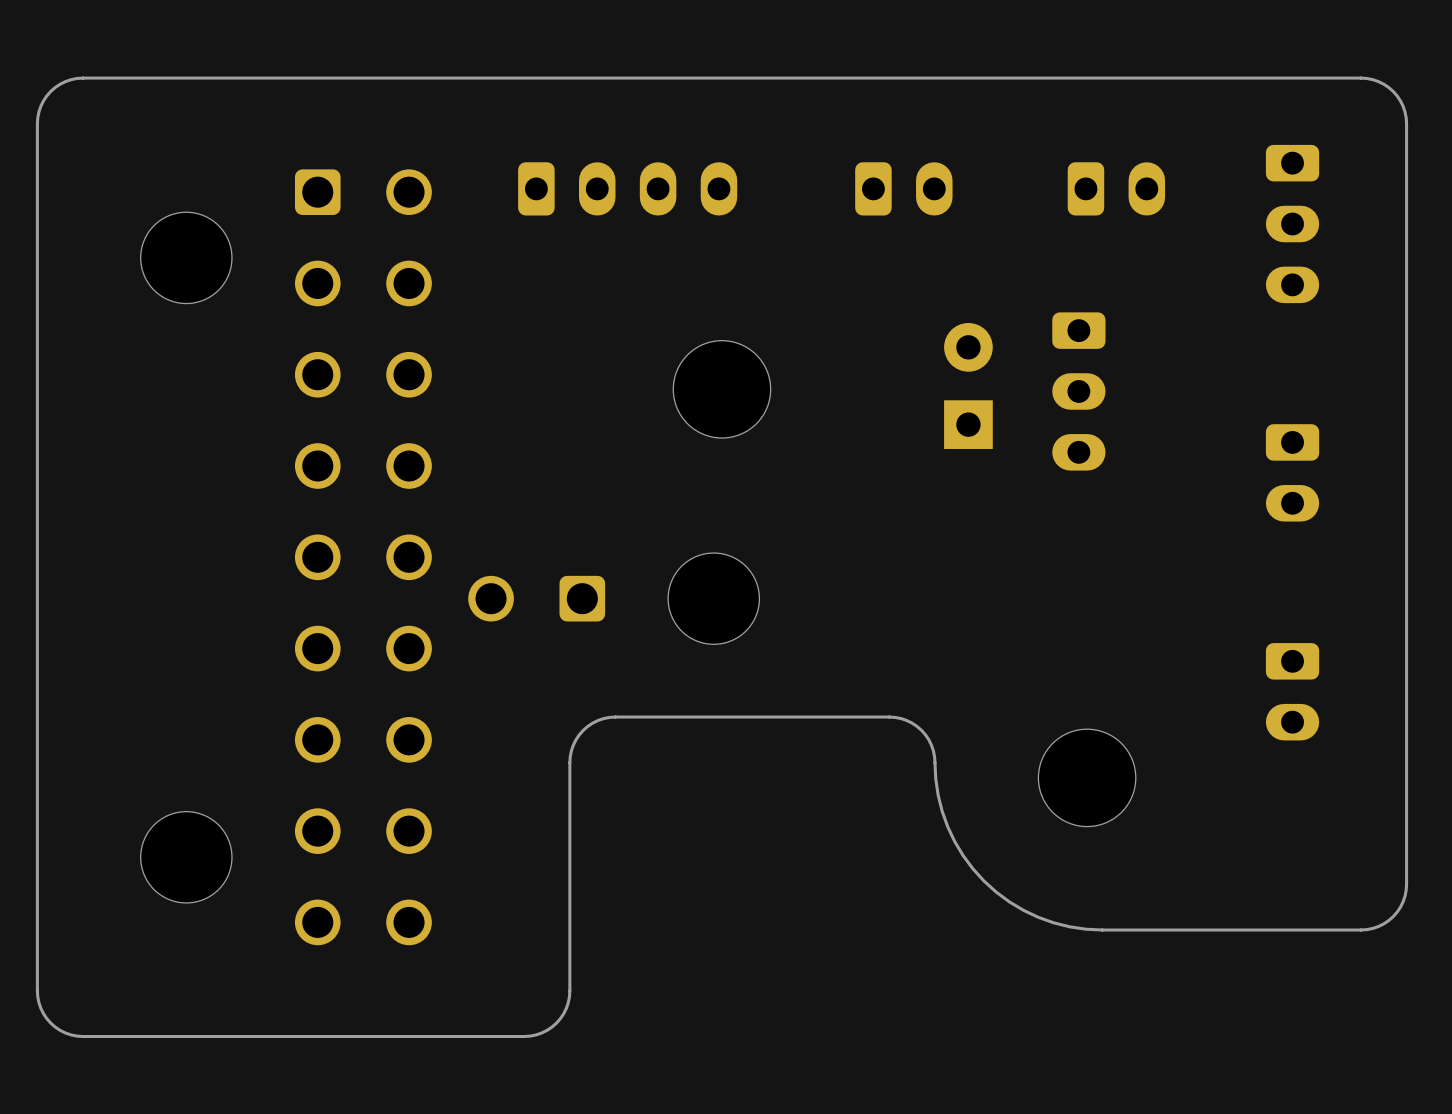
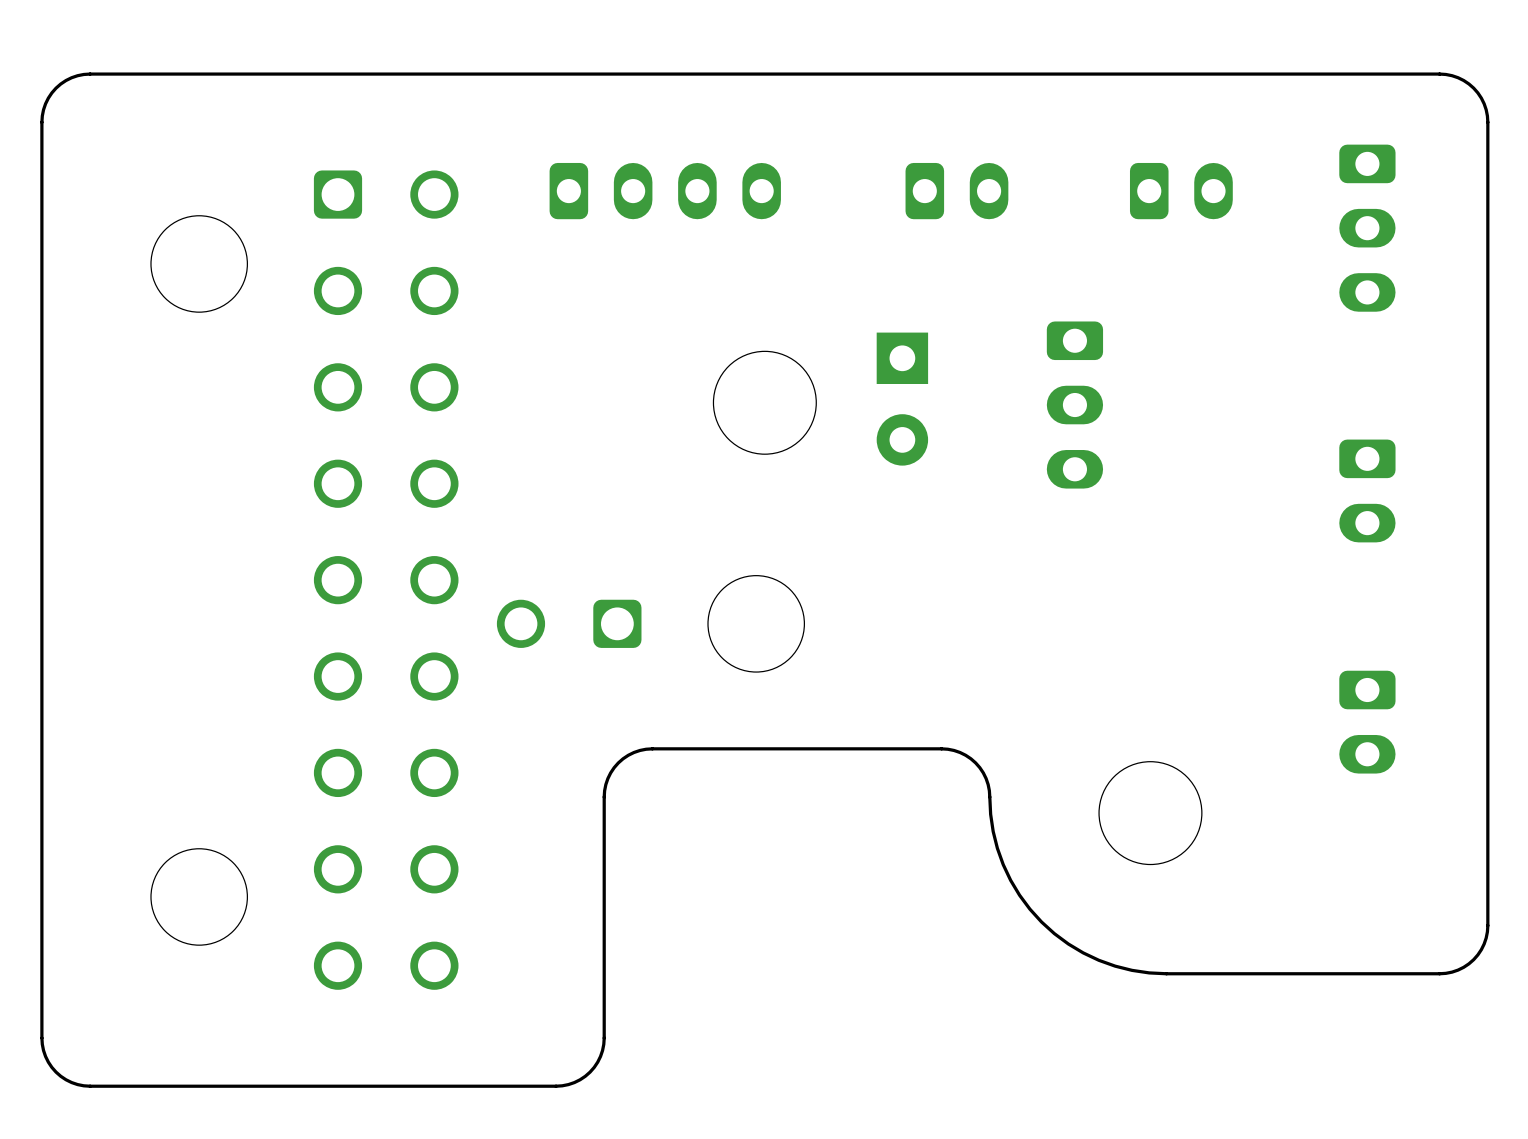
part rotation: 0° (968, 385) -> 180° (902, 399)
part position: (968, 385) -> (902, 399)
part position: (1078, 391) -> (1074, 405)

